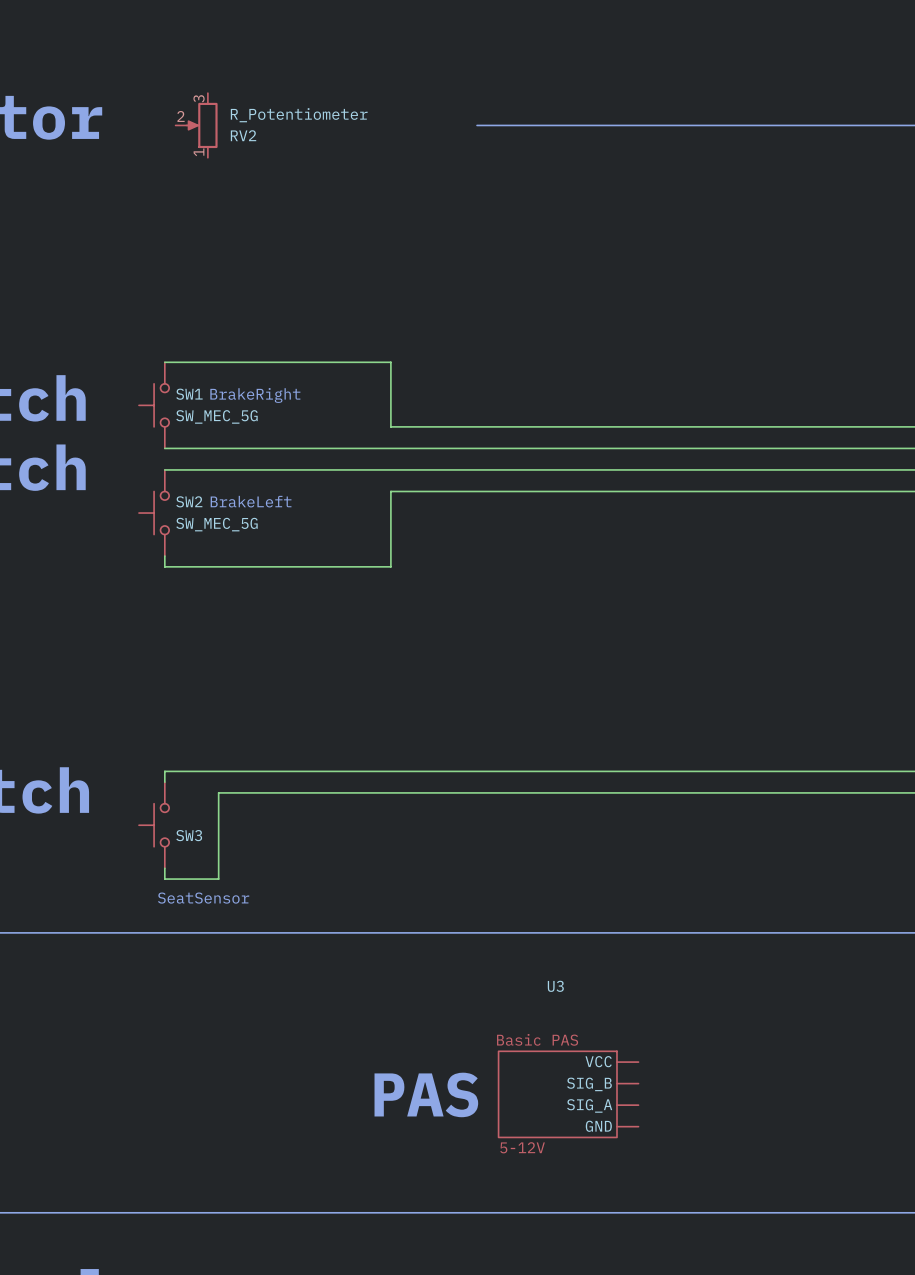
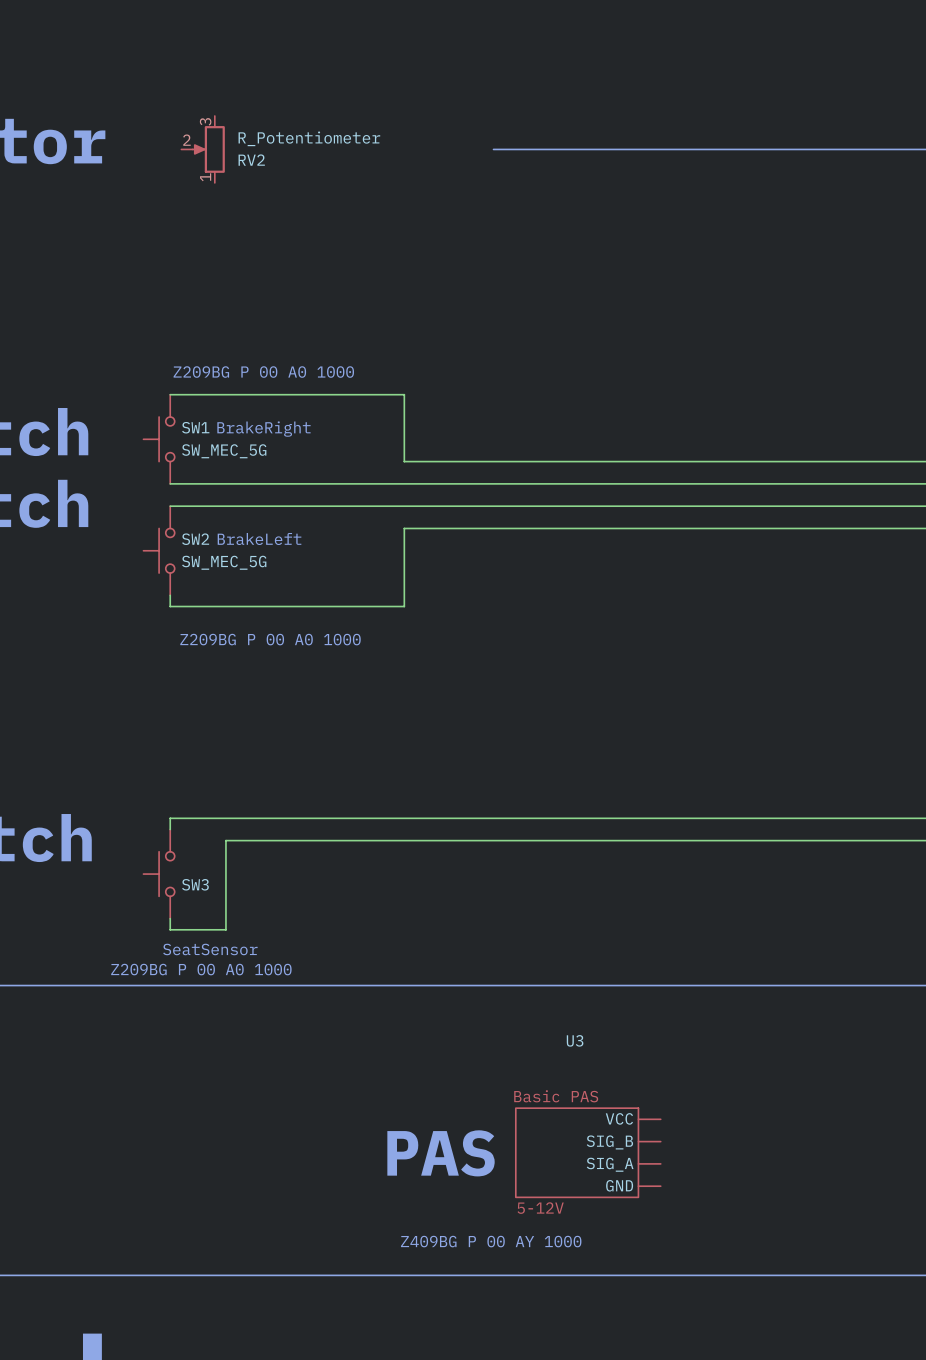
text: none -> Z209BG P 00 A0 1000 (263, 372)
text: none -> Z209BG P 00 A0 1000 (270, 639)
text: none -> Z209BG P 00 A0 1000 (201, 969)
text: none -> Z409BG P 00 AY 1000 (491, 1241)

